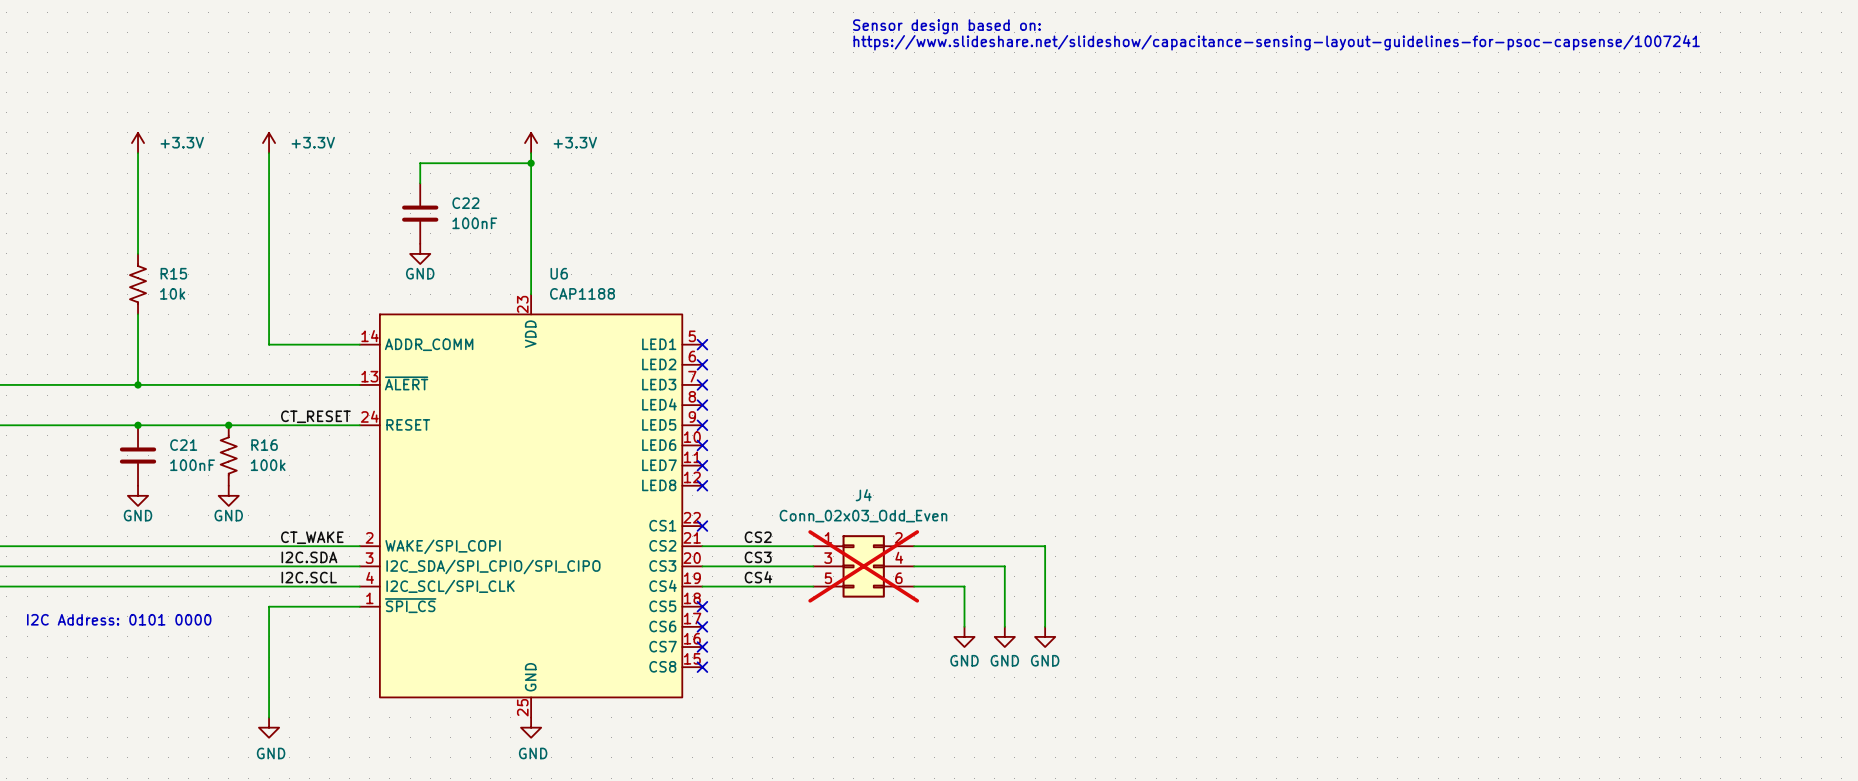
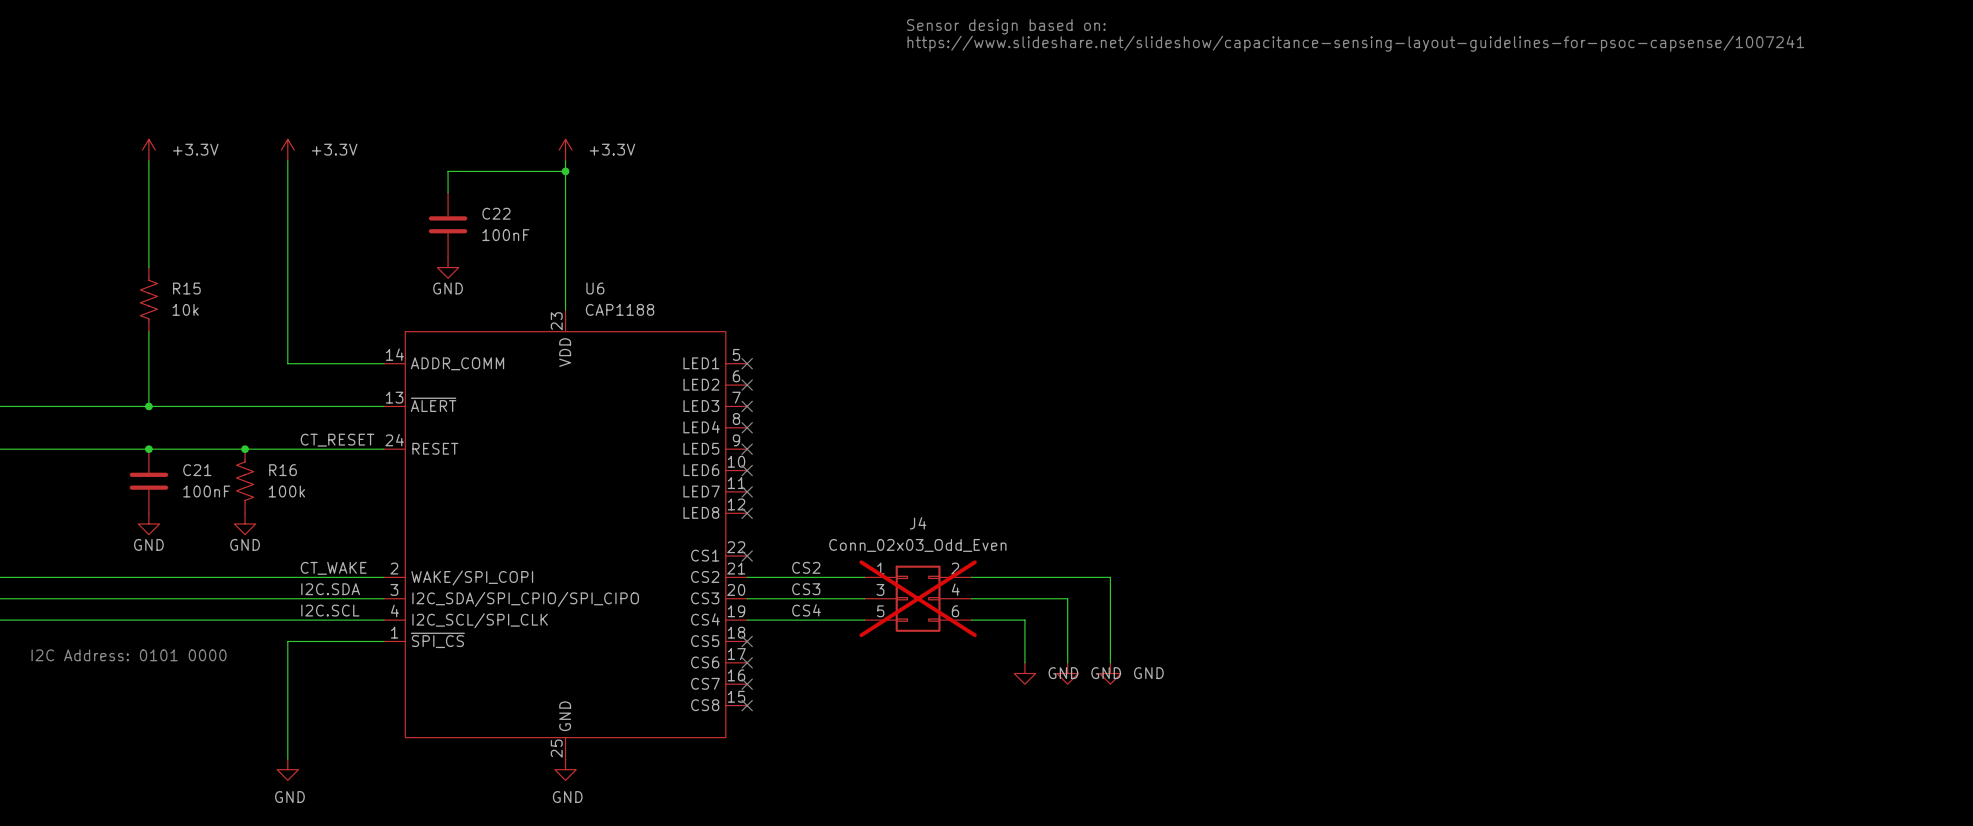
power symbol text position: GND (964, 660) -> GND (1063, 673)
power symbol text position: GND (1004, 660) -> GND (1106, 673)
power symbol text position: GND (1045, 660) -> GND (1148, 673)

